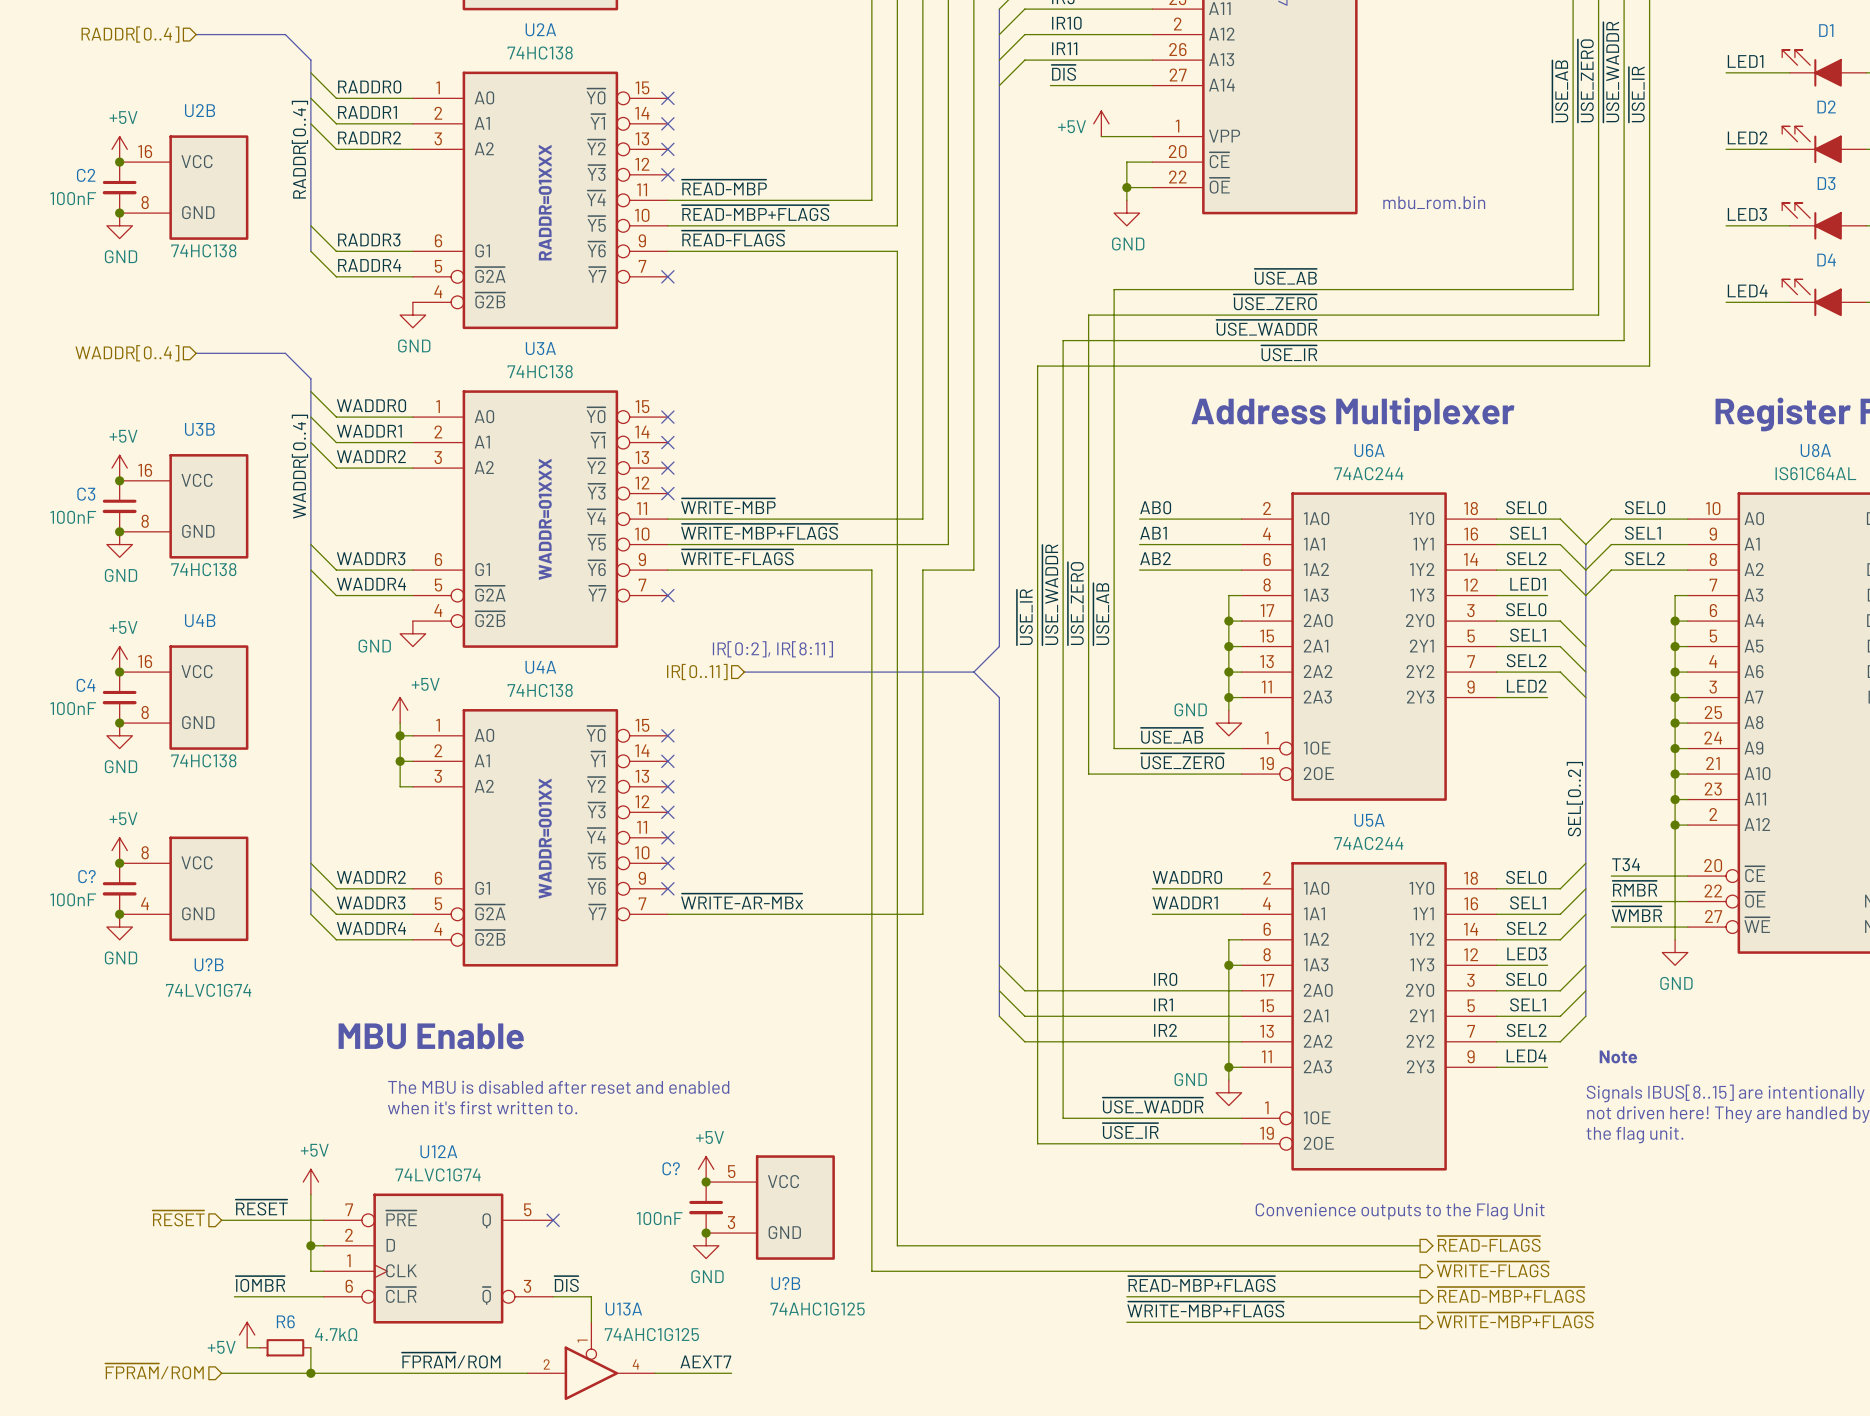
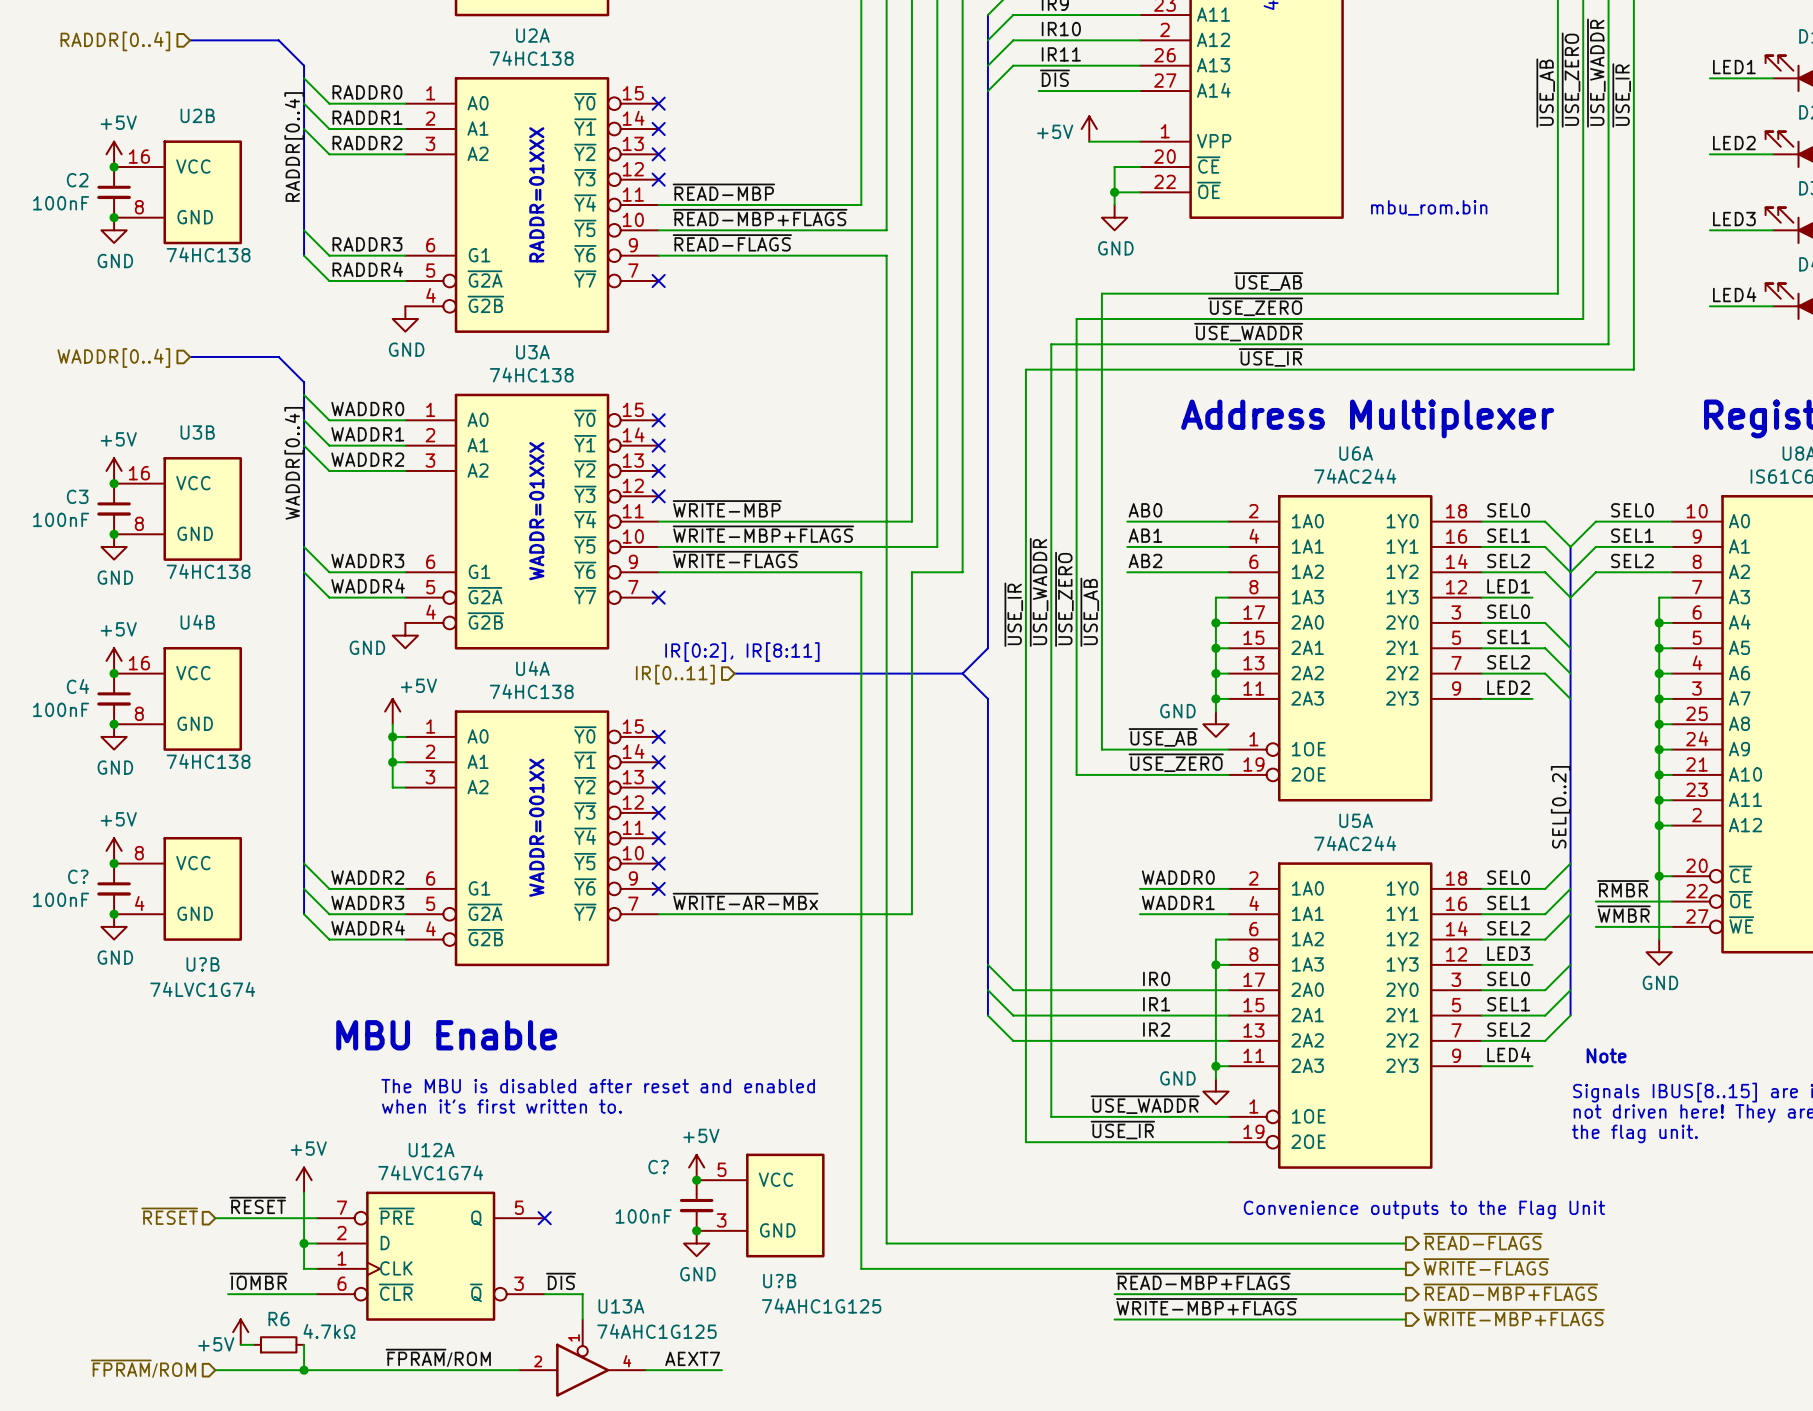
label: T34 (1626, 864) -> none
wire: (1611, 876) (1675, 876) -> none
junction: none -> (1659, 876)

